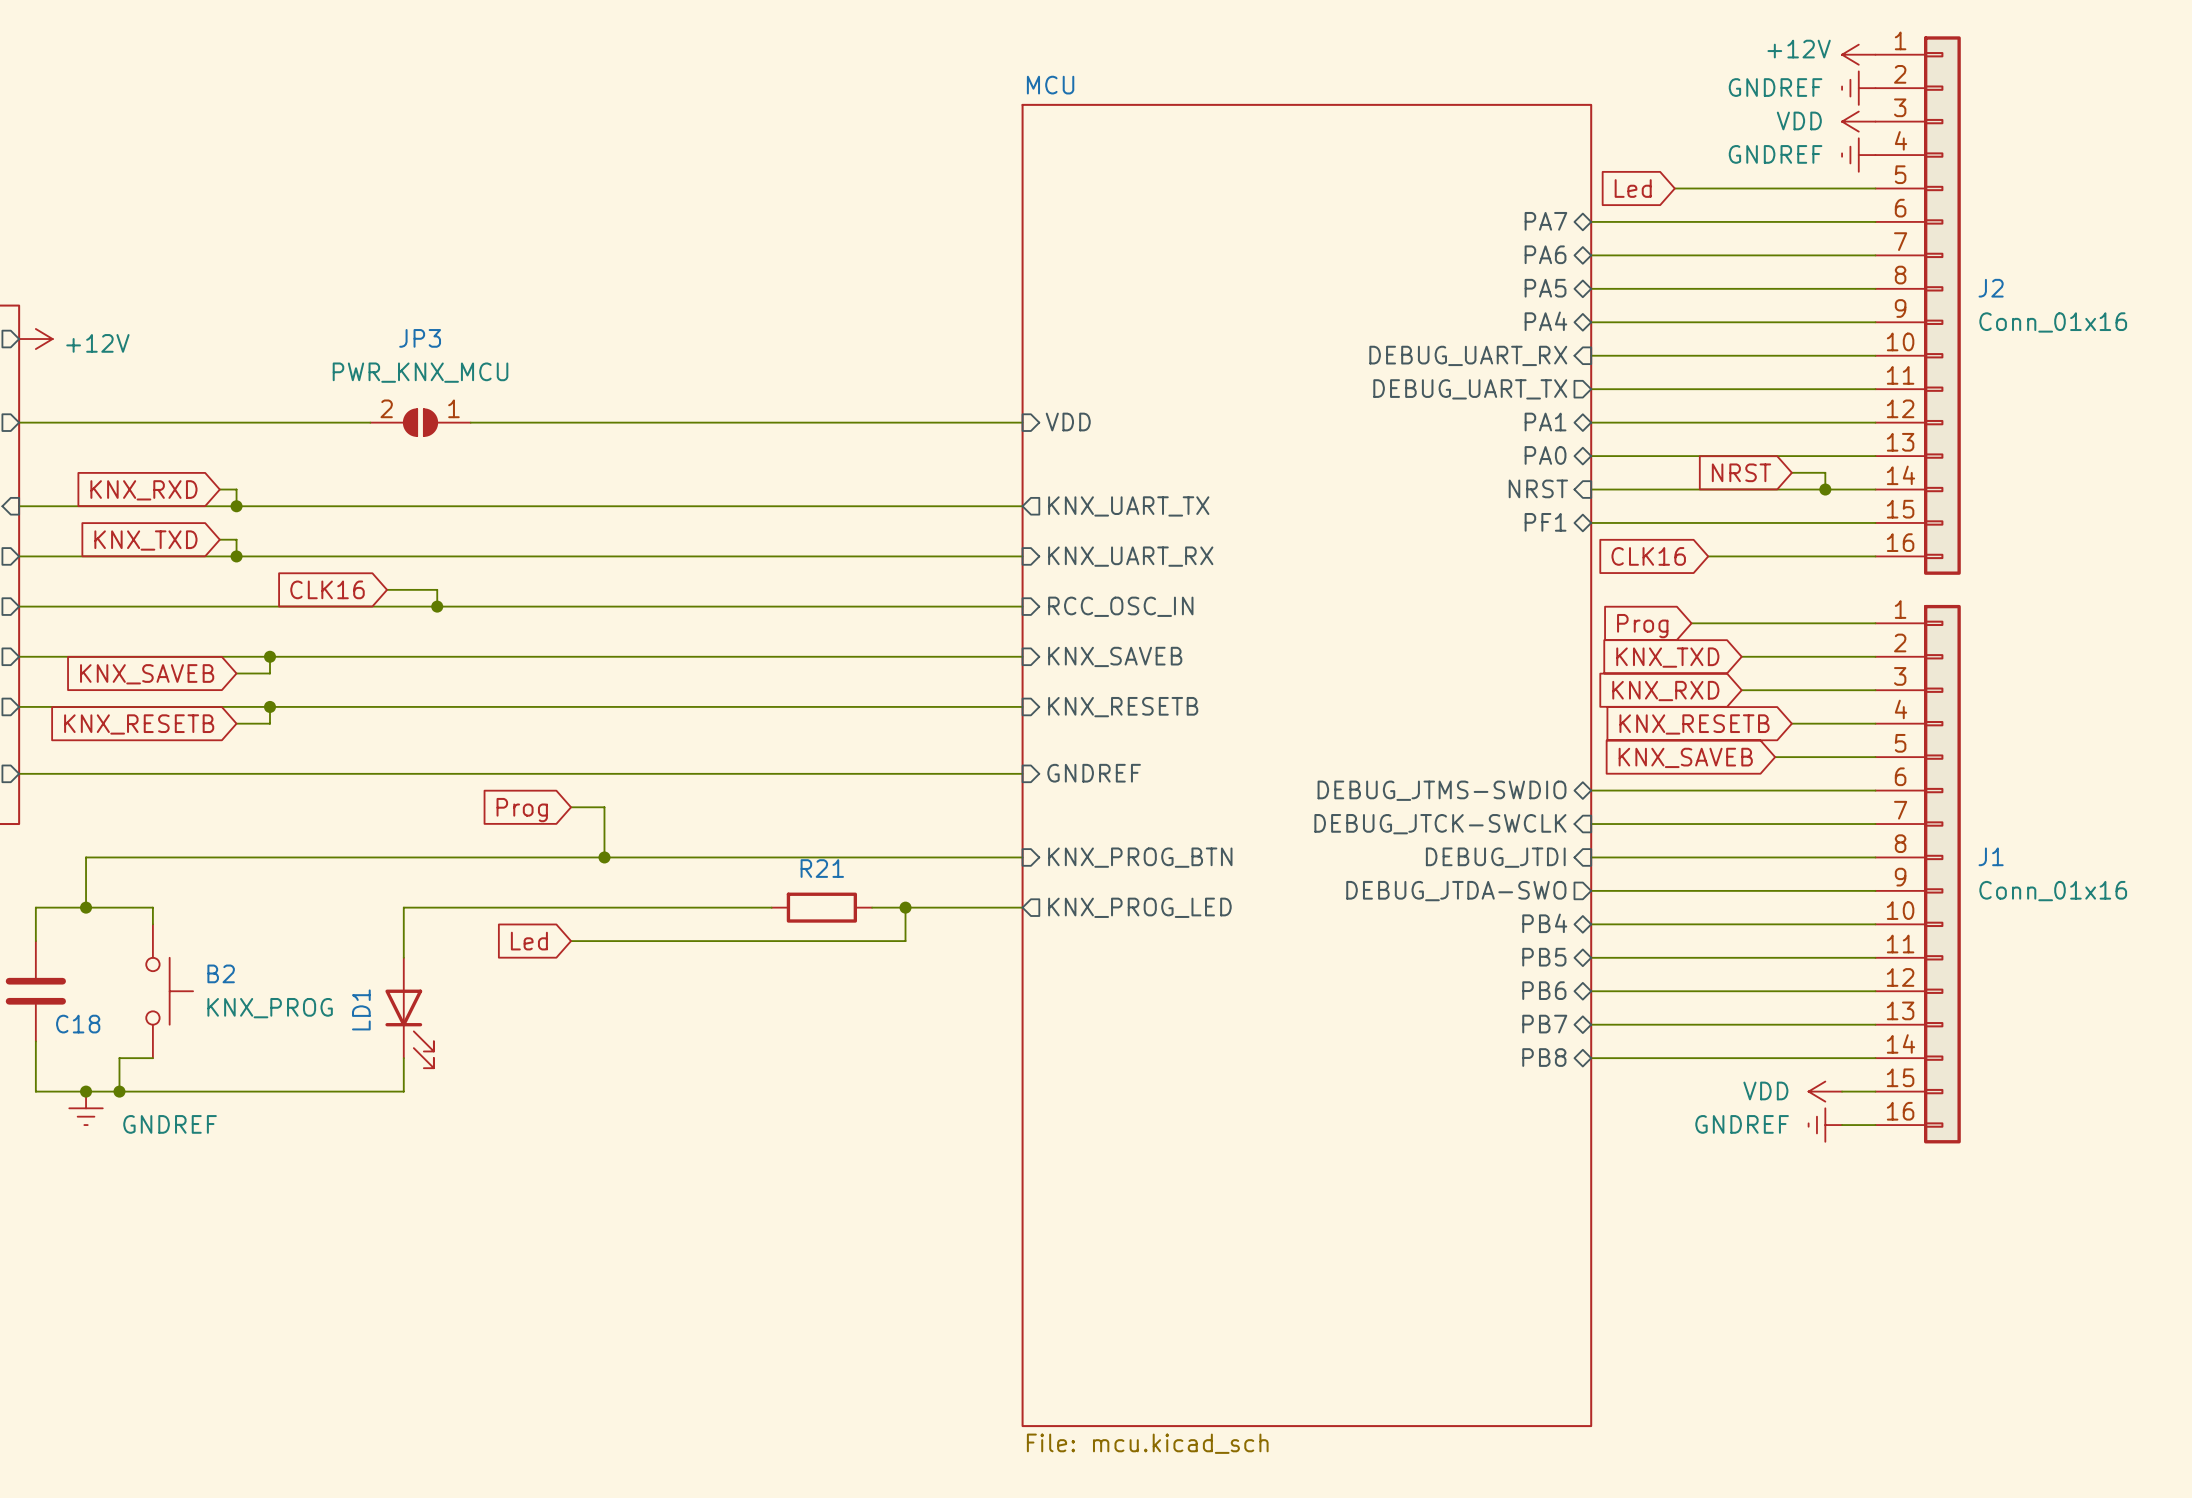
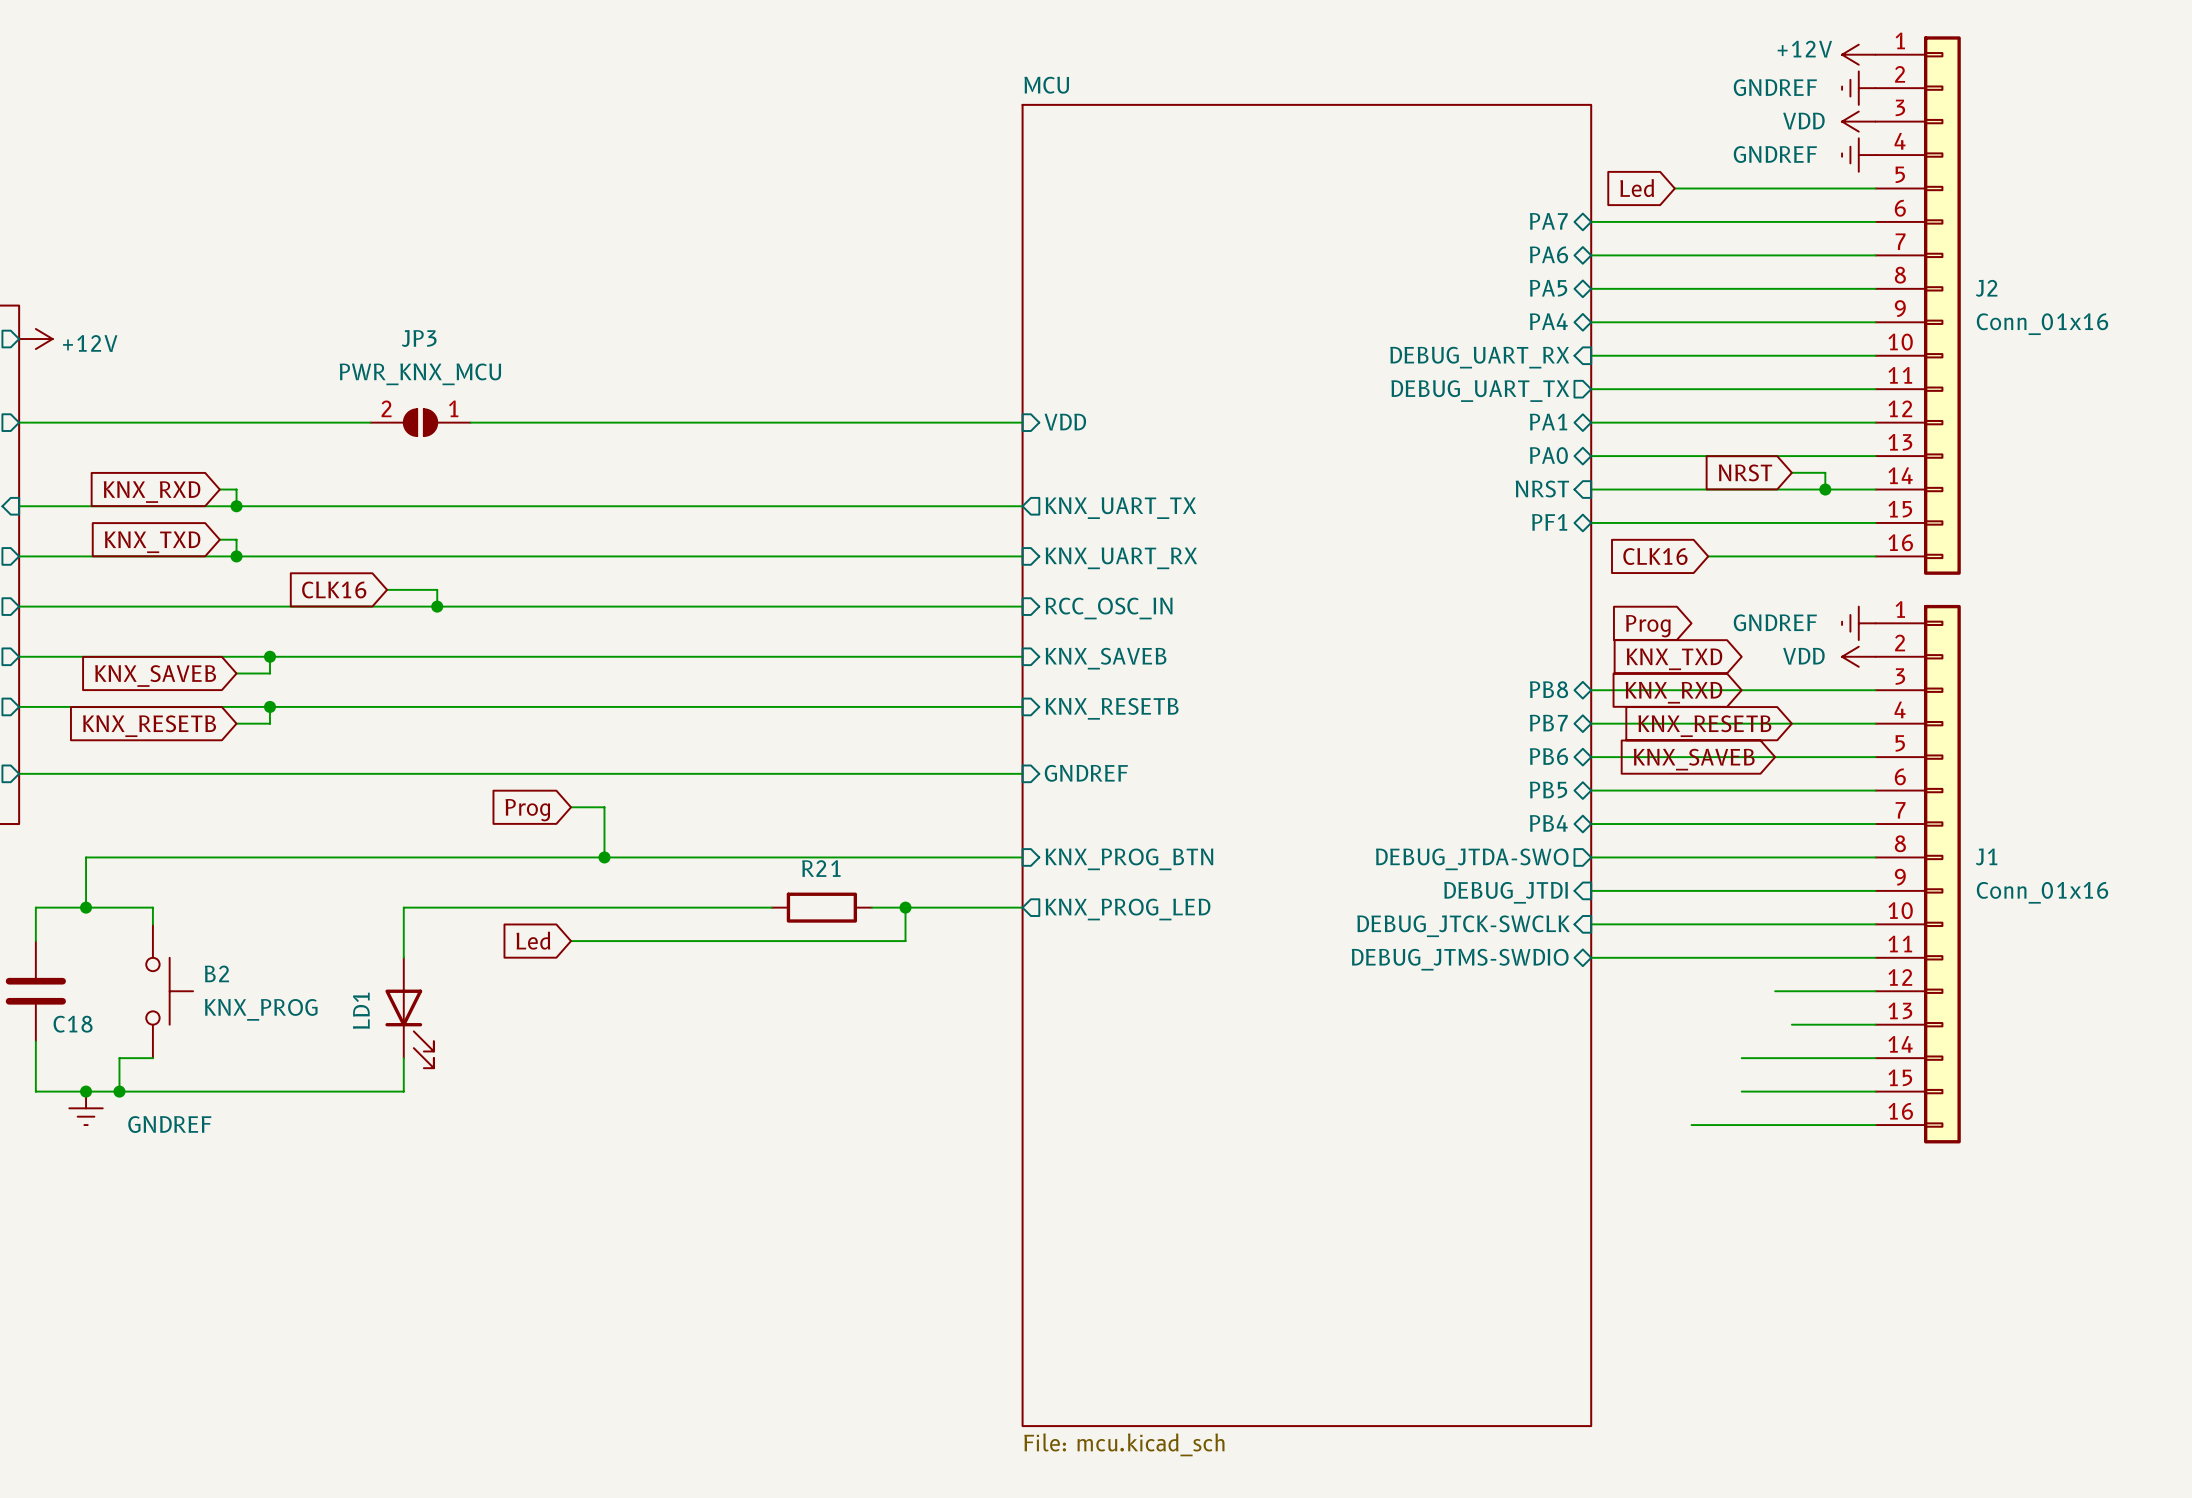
wire: (1691, 623) (1875, 623) -> (1591, 757) (1775, 757)
power symbol: none -> GNDREF (1858, 623)
wire: (1741, 656) (1875, 656) -> none
power symbol: none -> VDD (1858, 656)
sheet pin: none -> PB8 (1548, 689)
wire: none -> (1591, 690) (1741, 690)
sheet pin: DEBUG_JTMS-SWDIO (1442, 790) -> PB5 (1548, 789)
sheet pin shape: input (1440, 824) -> bidirectional (1548, 823)
sheet pin: DEBUG_JTCK-SWCLK (1440, 824) -> PB4 (1548, 823)
sheet pin shape: input (1495, 857) -> output (1472, 859)
sheet pin: DEBUG_JTDI (1495, 857) -> DEBUG_JTDA-SWO (1472, 859)
sheet pin shape: output (1456, 891) -> input (1505, 892)
sheet pin: DEBUG_JTDA-SWO (1456, 891) -> DEBUG_JTDI (1505, 892)
sheet pin shape: bidirectional (1544, 923) -> input (1463, 926)
sheet pin: PB4 (1544, 923) -> DEBUG_JTCK-SWCLK (1463, 926)
sheet pin: PB5 (1544, 957) -> DEBUG_JTMS-SWDIO (1460, 959)
sheet pin position: PB6 (1544, 990) -> PB6 (1548, 756)
wire: (1591, 991) (1775, 991) -> none
sheet pin position: PB7 (1544, 1024) -> PB7 (1548, 723)
wire: (1591, 1024) (1791, 1024) -> (1591, 723) (1791, 723)
sheet pin: PB8 (1544, 1057) -> none
wire: (1591, 1058) (1741, 1058) -> (1691, 1125) (1842, 1125)
wire: none -> (1741, 1091) (1842, 1091)
power symbol: VDD (1825, 1091) -> none
power symbol: GNDREF (1825, 1125) -> none

